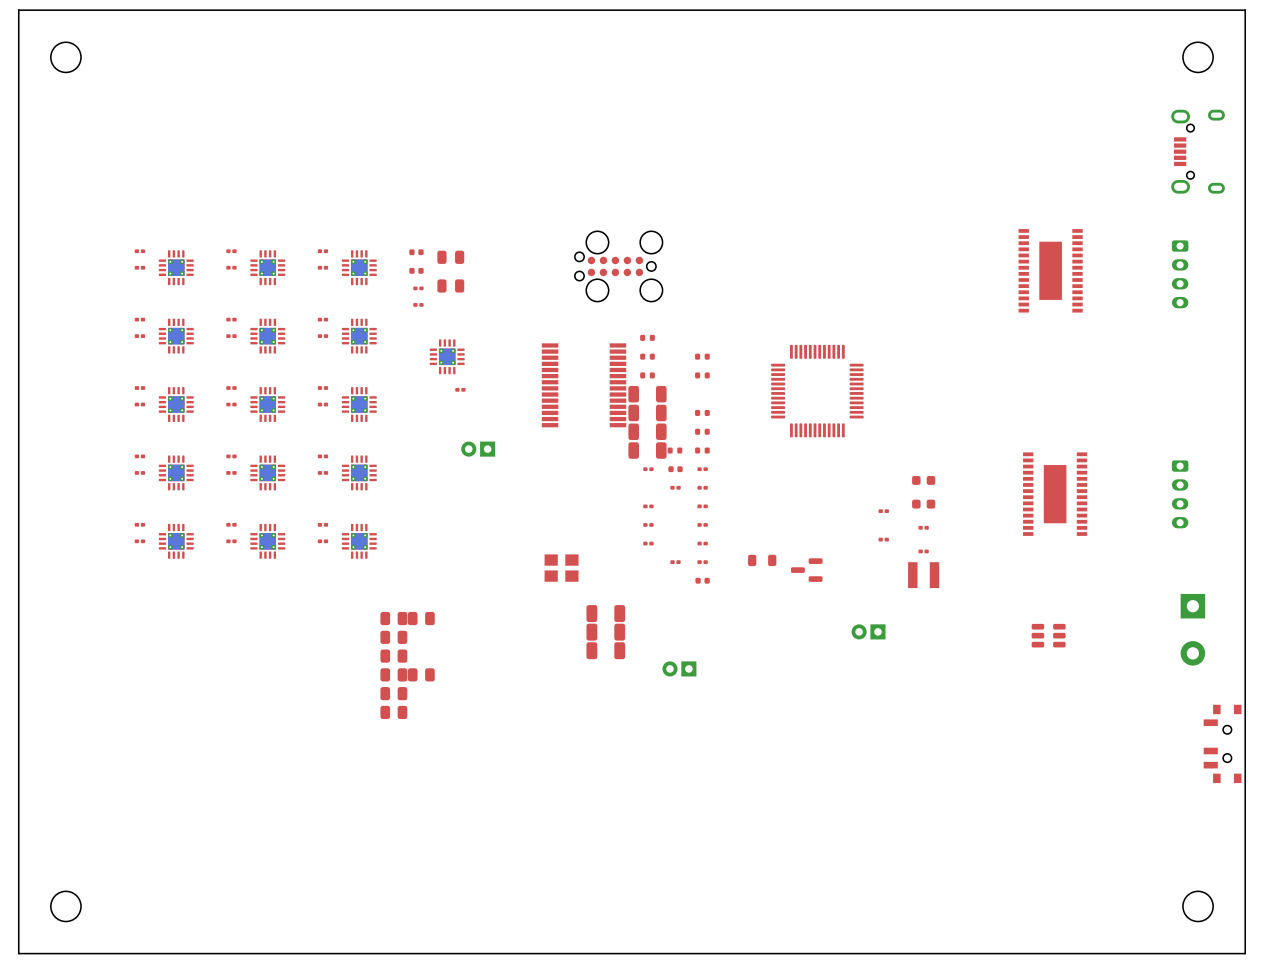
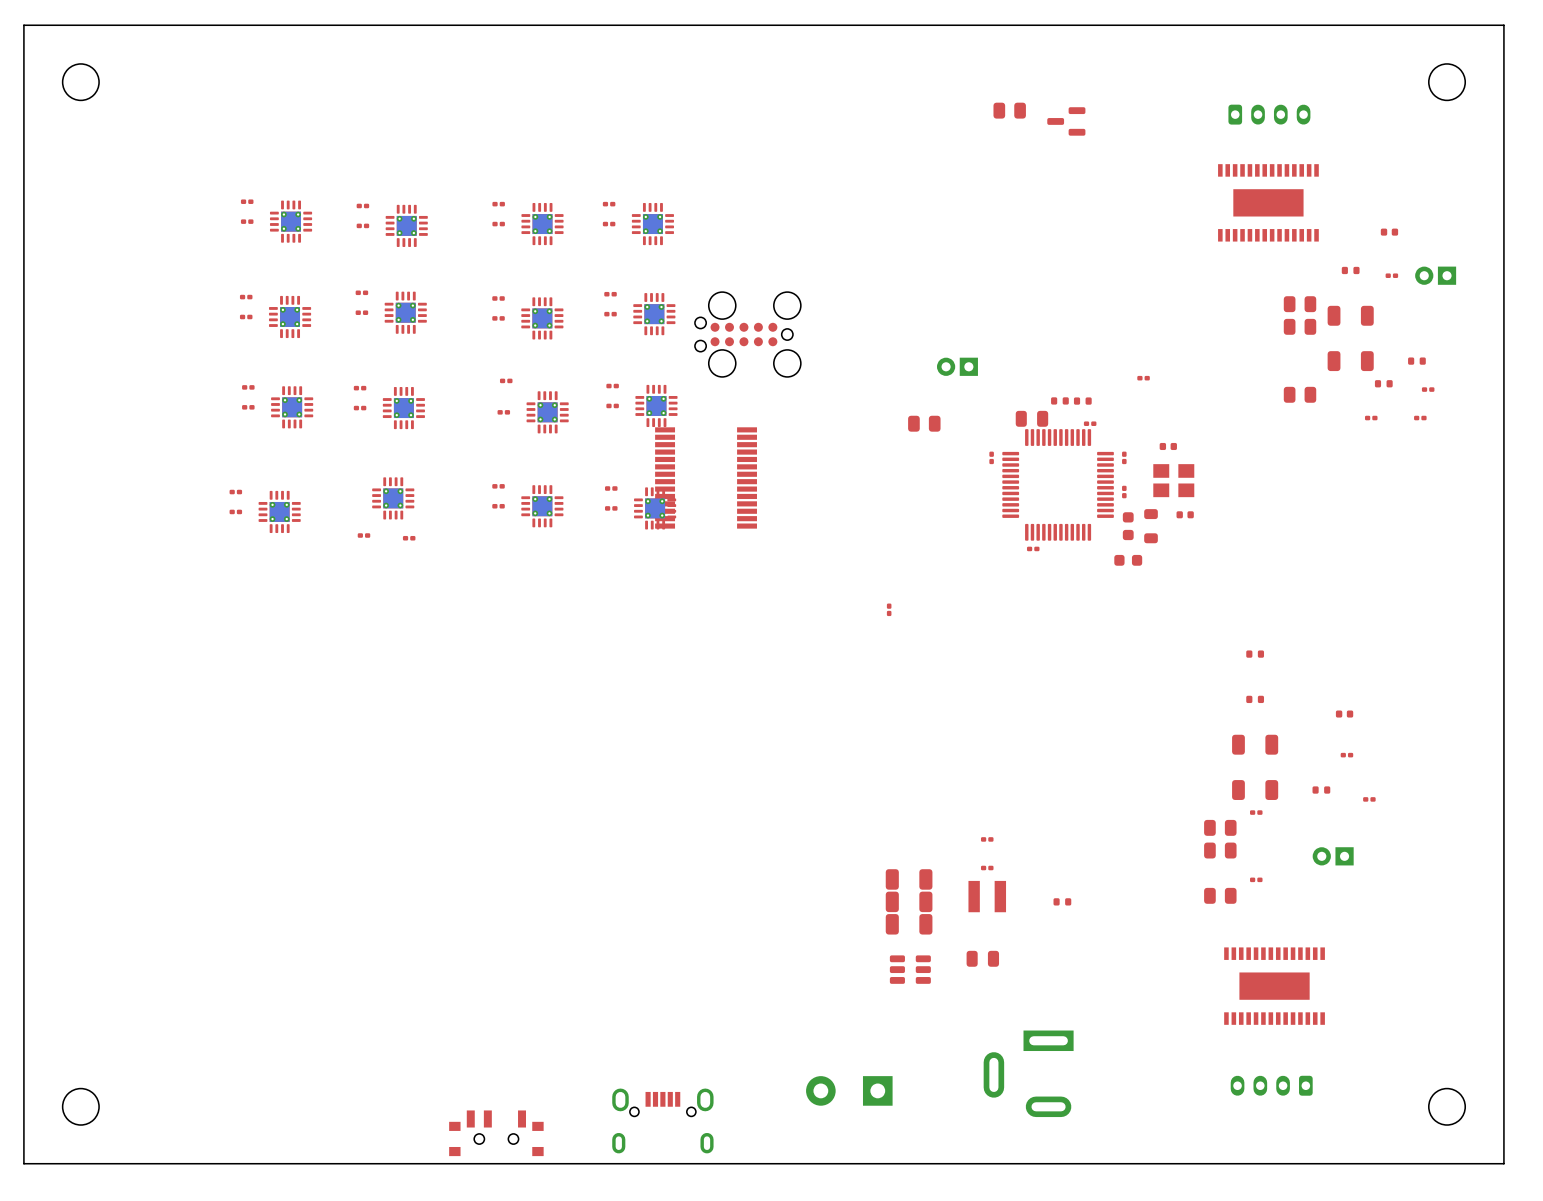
part: none -> (1009, 110)
part: none -> (1269, 114)
part: none -> (1066, 121)
part: (1198, 151) -> none
part: none -> (247, 201)
part: none -> (498, 204)
part: none -> (609, 204)
part: none -> (362, 205)
part: none -> (247, 221)
part: none -> (291, 221)
part: none -> (498, 224)
part: none -> (542, 224)
part: none -> (609, 224)
part: none -> (652, 224)
part: none -> (362, 225)
part: none -> (406, 225)
part: none -> (1389, 232)
part: none -> (1350, 270)
part: none -> (1391, 275)
part: none -> (1435, 275)
part: none -> (361, 292)
part: none -> (610, 294)
part: none -> (246, 297)
part: none -> (498, 298)
part: none -> (1300, 304)
part: none -> (361, 312)
part footprint: [226, 249, 237, 254] -> [268, 295, 312, 339]
part footprint: [409, 249, 424, 256] -> [492, 316, 505, 321]
part: none -> (610, 314)
part: none -> (654, 314)
part footprint: [437, 250, 465, 264] -> [521, 297, 564, 340]
part: none -> (1350, 315)
part: (139, 251) -> none
part: none -> (246, 316)
part: (322, 251) -> none
part: none -> (1300, 326)
part: (139, 267) -> none
part: (176, 267) -> none
part: (231, 267) -> none
part: (267, 267) -> none
part: (322, 267) -> none
part position: (359, 267) -> (405, 312)
part: (416, 270) -> none
part rotation: 0° (1050, 270) -> 90° clockwise (1268, 202)
part position: (1050, 270) -> (1268, 202)
part: (1180, 274) -> none
part: (450, 285) -> none
part: (418, 288) -> none
part: none -> (1350, 361)
part: none -> (1416, 361)
part: none -> (957, 366)
part: none -> (1143, 378)
part: none -> (1383, 383)
part: none -> (612, 386)
part: none -> (248, 387)
part: none -> (360, 388)
part: none -> (1428, 389)
part: none -> (1300, 394)
part: (139, 319) -> none
part: (231, 319) -> none
part: (322, 319) -> none
part: none -> (1059, 400)
part: none -> (1082, 401)
part: none -> (612, 405)
part: none -> (656, 405)
part: none -> (248, 407)
part: none -> (360, 408)
part: none -> (503, 412)
part: none -> (547, 412)
part: none -> (1371, 418)
part: none -> (1420, 418)
part: (139, 336) -> none
part: (176, 336) -> none
part: (231, 336) -> none
part position: (267, 336) -> (292, 407)
part: (322, 336) -> none
part position: (359, 336) -> (403, 408)
part: none -> (1031, 418)
part: (647, 337) -> none
part: none -> (924, 423)
part: none -> (1090, 423)
part: (447, 356) -> none
part: (647, 356) -> none
part: (702, 356) -> none
part: none -> (1168, 446)
part: none -> (991, 457)
part: none -> (1124, 457)
part: (647, 375) -> none
part: (702, 375) -> none
part: none -> (1173, 480)
part: (139, 388) -> none
part: (231, 388) -> none
part: (322, 388) -> none
part: (460, 389) -> none
part position: (817, 391) -> (1058, 484)
part: none -> (498, 486)
part: none -> (611, 488)
part: (647, 394) -> none
part: none -> (235, 492)
part: none -> (1124, 492)
part footprint: [226, 402, 237, 407] -> [258, 490, 301, 534]
part footprint: [317, 402, 329, 407] -> [372, 477, 415, 520]
part: (139, 404) -> none
part: (176, 404) -> none
part: (267, 404) -> none
part: (359, 404) -> none
part: none -> (498, 506)
part: none -> (542, 506)
part: none -> (611, 508)
part: none -> (655, 508)
part: (647, 412) -> none
part: (702, 412) -> none
part: none -> (235, 511)
part: none -> (1185, 514)
part: none -> (1128, 526)
part: (647, 431) -> none
part: (702, 431) -> none
part: none -> (363, 535)
part: none -> (409, 538)
part: none -> (1033, 548)
part: (478, 449) -> none
part: (647, 450) -> none
part: (674, 450) -> none
part: (702, 450) -> none
part: none -> (1128, 560)
part: (139, 456) -> none
part: (231, 456) -> none
part: (322, 456) -> none
part: (648, 469) -> none
part: (675, 469) -> none
part: (702, 469) -> none
part: (139, 472) -> none
part: (176, 472) -> none
part: (231, 472) -> none
part: (267, 472) -> none
part: (322, 472) -> none
part: (359, 472) -> none
part: (923, 480) -> none
part: (675, 487) -> none
part: (702, 487) -> none
part: none -> (889, 609)
part: (1055, 494) -> none
part: (1180, 494) -> none
part: (923, 504) -> none
part: (648, 506) -> none
part: (702, 506) -> none
part: (883, 511) -> none
part: (139, 524) -> none
part: (231, 524) -> none
part: (322, 524) -> none
part: (648, 524) -> none
part: (702, 524) -> none
part: (923, 527) -> none
part: none -> (1255, 654)
part: (883, 539) -> none
part: (139, 541) -> none
part: (176, 541) -> none
part: (231, 541) -> none
part: (267, 541) -> none
part: (322, 541) -> none
part: (359, 541) -> none
part: (648, 543) -> none
part: (702, 543) -> none
part: (923, 551) -> none
part rotation: 0° (762, 560) -> 90° clockwise (1151, 526)
part position: (762, 560) -> (1151, 526)
part: (675, 562) -> none
part: (702, 562) -> none
part: (561, 568) -> none
part: none -> (1255, 699)
part: (806, 570) -> none
part position: (923, 575) -> (987, 896)
part: (702, 580) -> none
part: none -> (1344, 714)
part: none -> (1255, 744)
part: (605, 613) -> none
part: none -> (1346, 755)
part: (393, 618) -> none
part: (421, 618) -> none
part: (1192, 629) -> none
part: (868, 631) -> none
part: (605, 632) -> none
part: (1048, 635) -> none
part: (393, 637) -> none
part: none -> (1255, 790)
part: none -> (1321, 790)
part: (605, 650) -> none
part: none -> (1369, 799)
part: (393, 656) -> none
part: none -> (1256, 812)
part: (679, 668) -> none
part: (393, 674) -> none
part: (421, 674) -> none
part: none -> (1220, 827)
part: none -> (987, 839)
part: (393, 693) -> none
part: none -> (1220, 850)
part: none -> (1333, 856)
part: none -> (987, 868)
part: (393, 712) -> none
part: none -> (909, 879)
part: none -> (1256, 879)
part: none -> (1220, 895)
part: none -> (909, 901)
part: none -> (1062, 901)
part: (1222, 743) -> none
part: none -> (909, 924)
part: none -> (982, 958)
part: none -> (910, 969)
part: none -> (1274, 986)
part: none -> (1028, 1073)
part: none -> (1271, 1085)
part: none -> (849, 1090)
part: none -> (662, 1120)
part: none -> (496, 1133)

